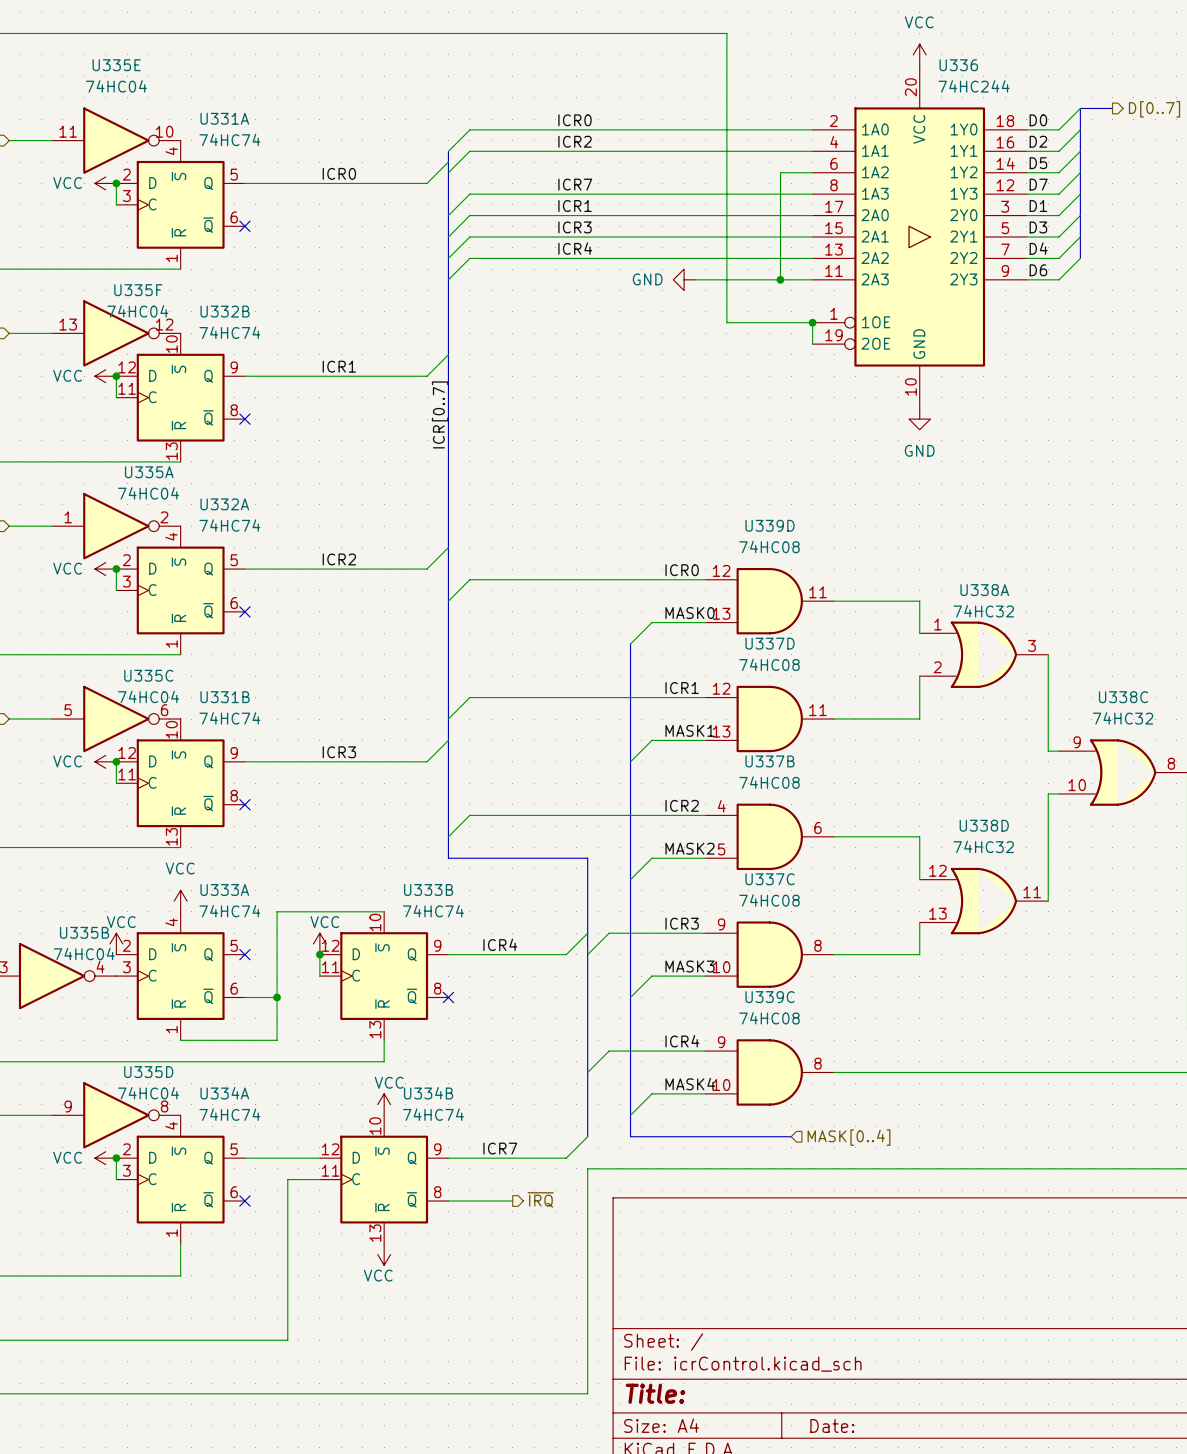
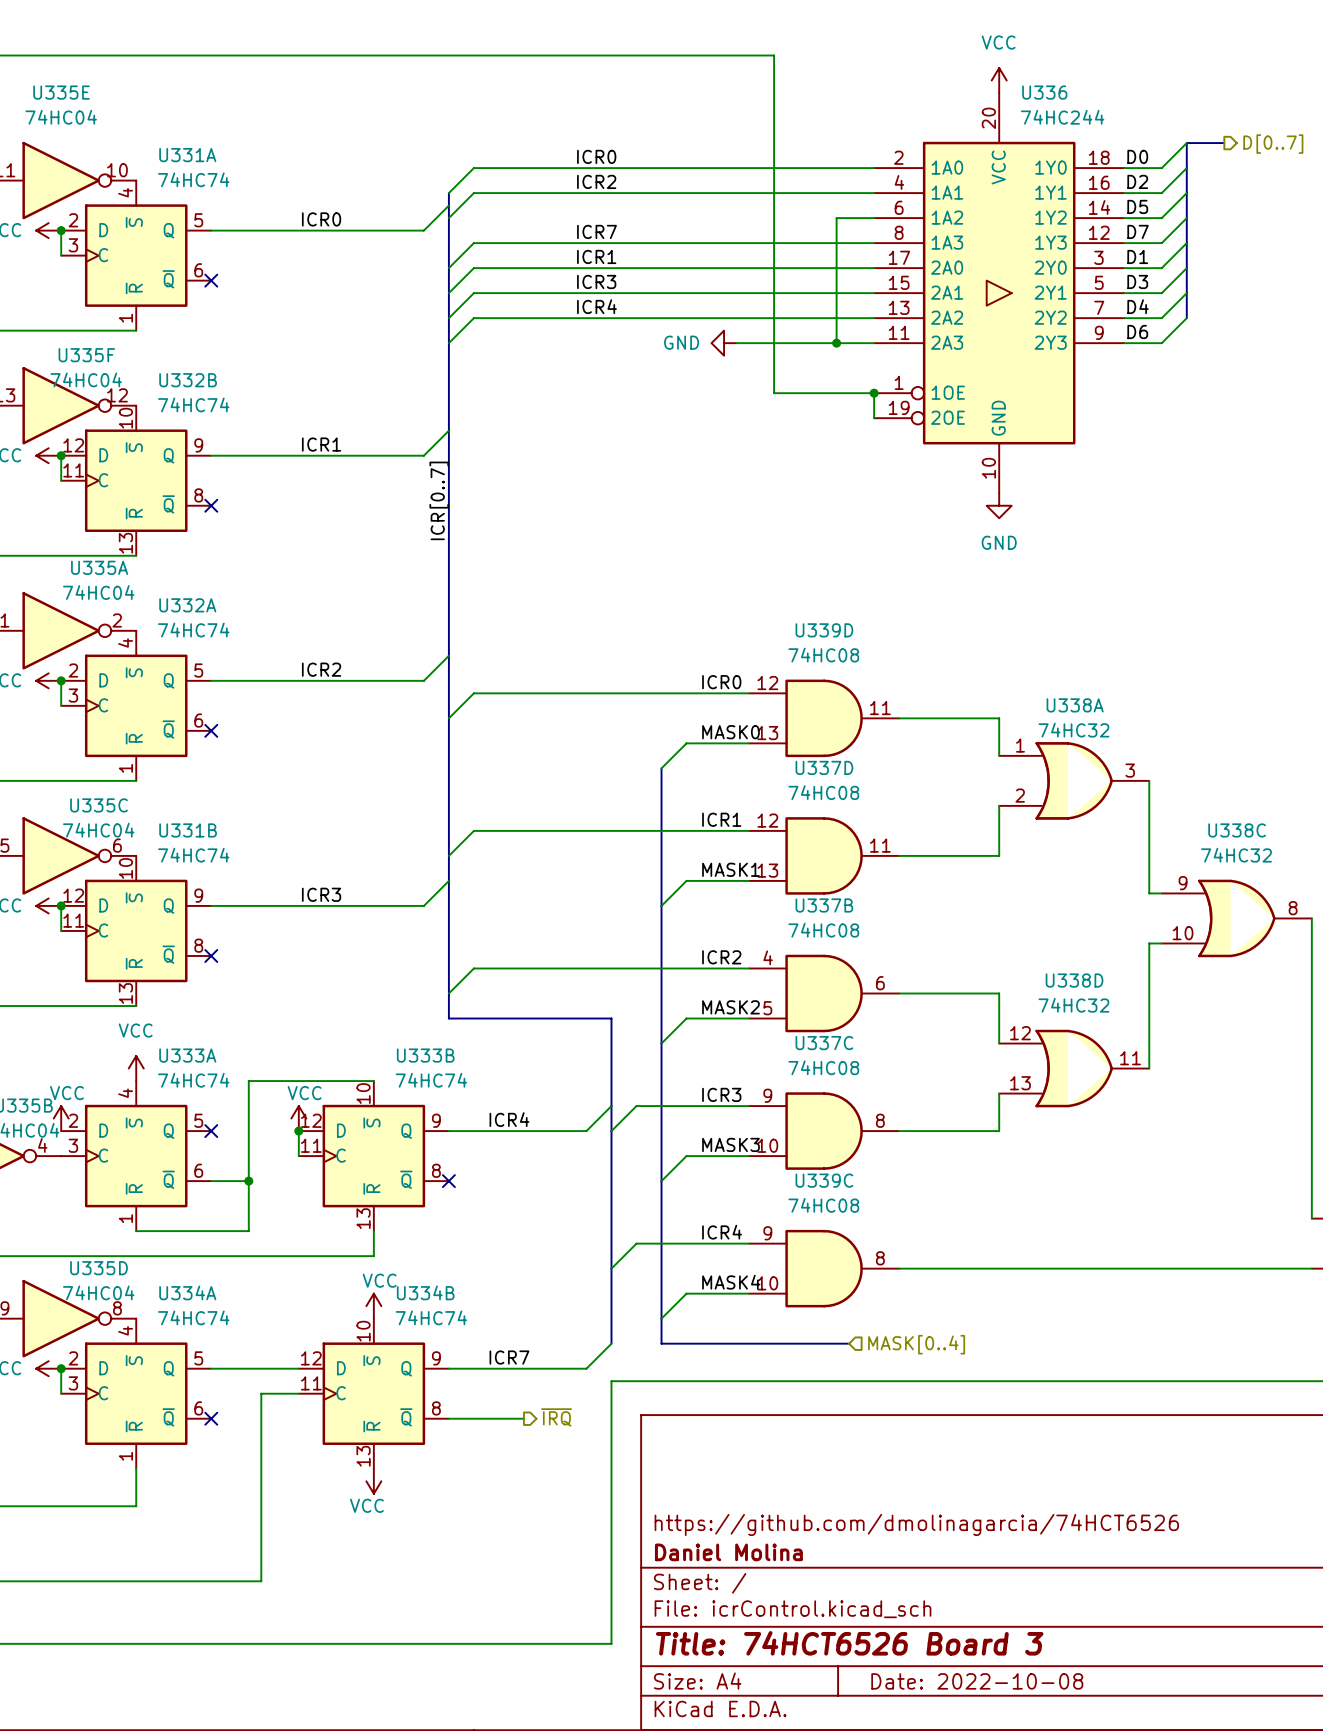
title block: none -> https://github.com/dmolinagarcia/74HCT6526 (916, 1524)
title block: none -> Daniel Molina (728, 1552)
title block: Title: (655, 1393) -> Title: 74HCT6526 Board 3 (849, 1643)
title block: Date: (832, 1425) -> Date: 2022-10-08 (977, 1681)

